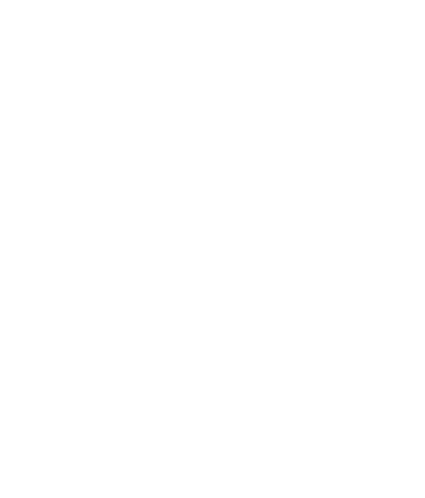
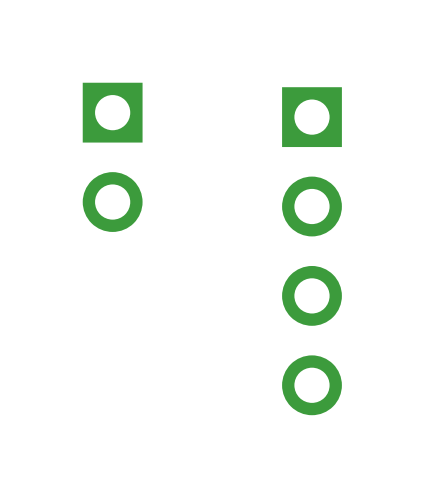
part: none -> (112, 157)
part: none -> (311, 251)

